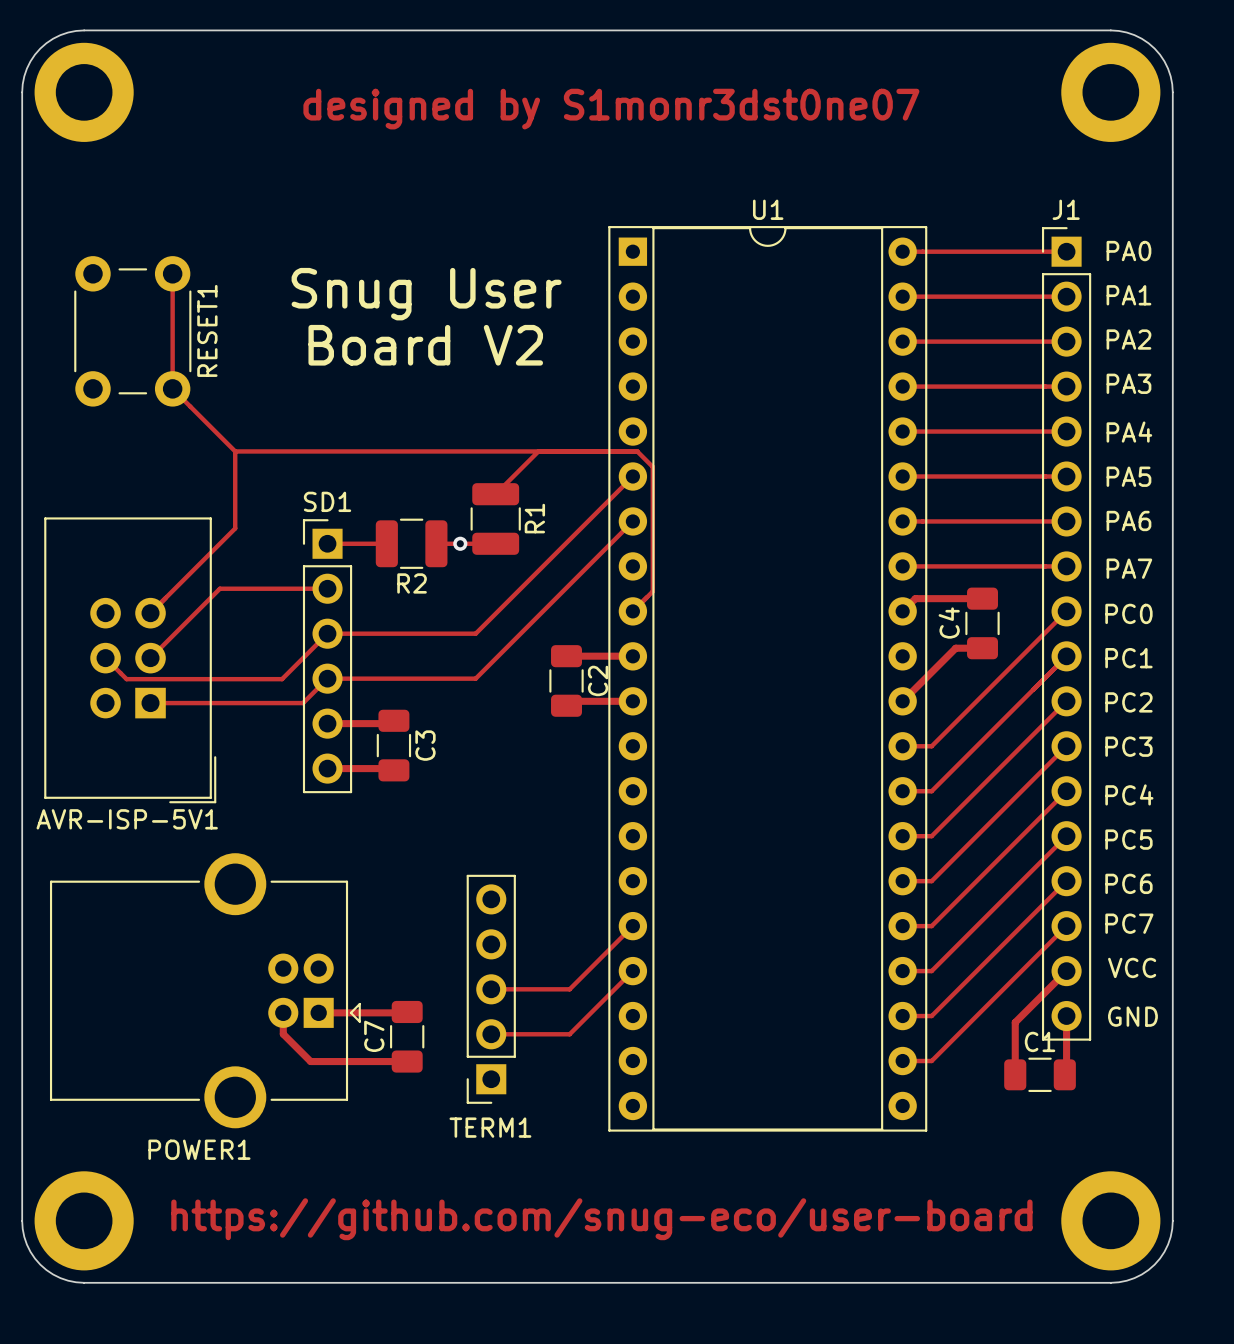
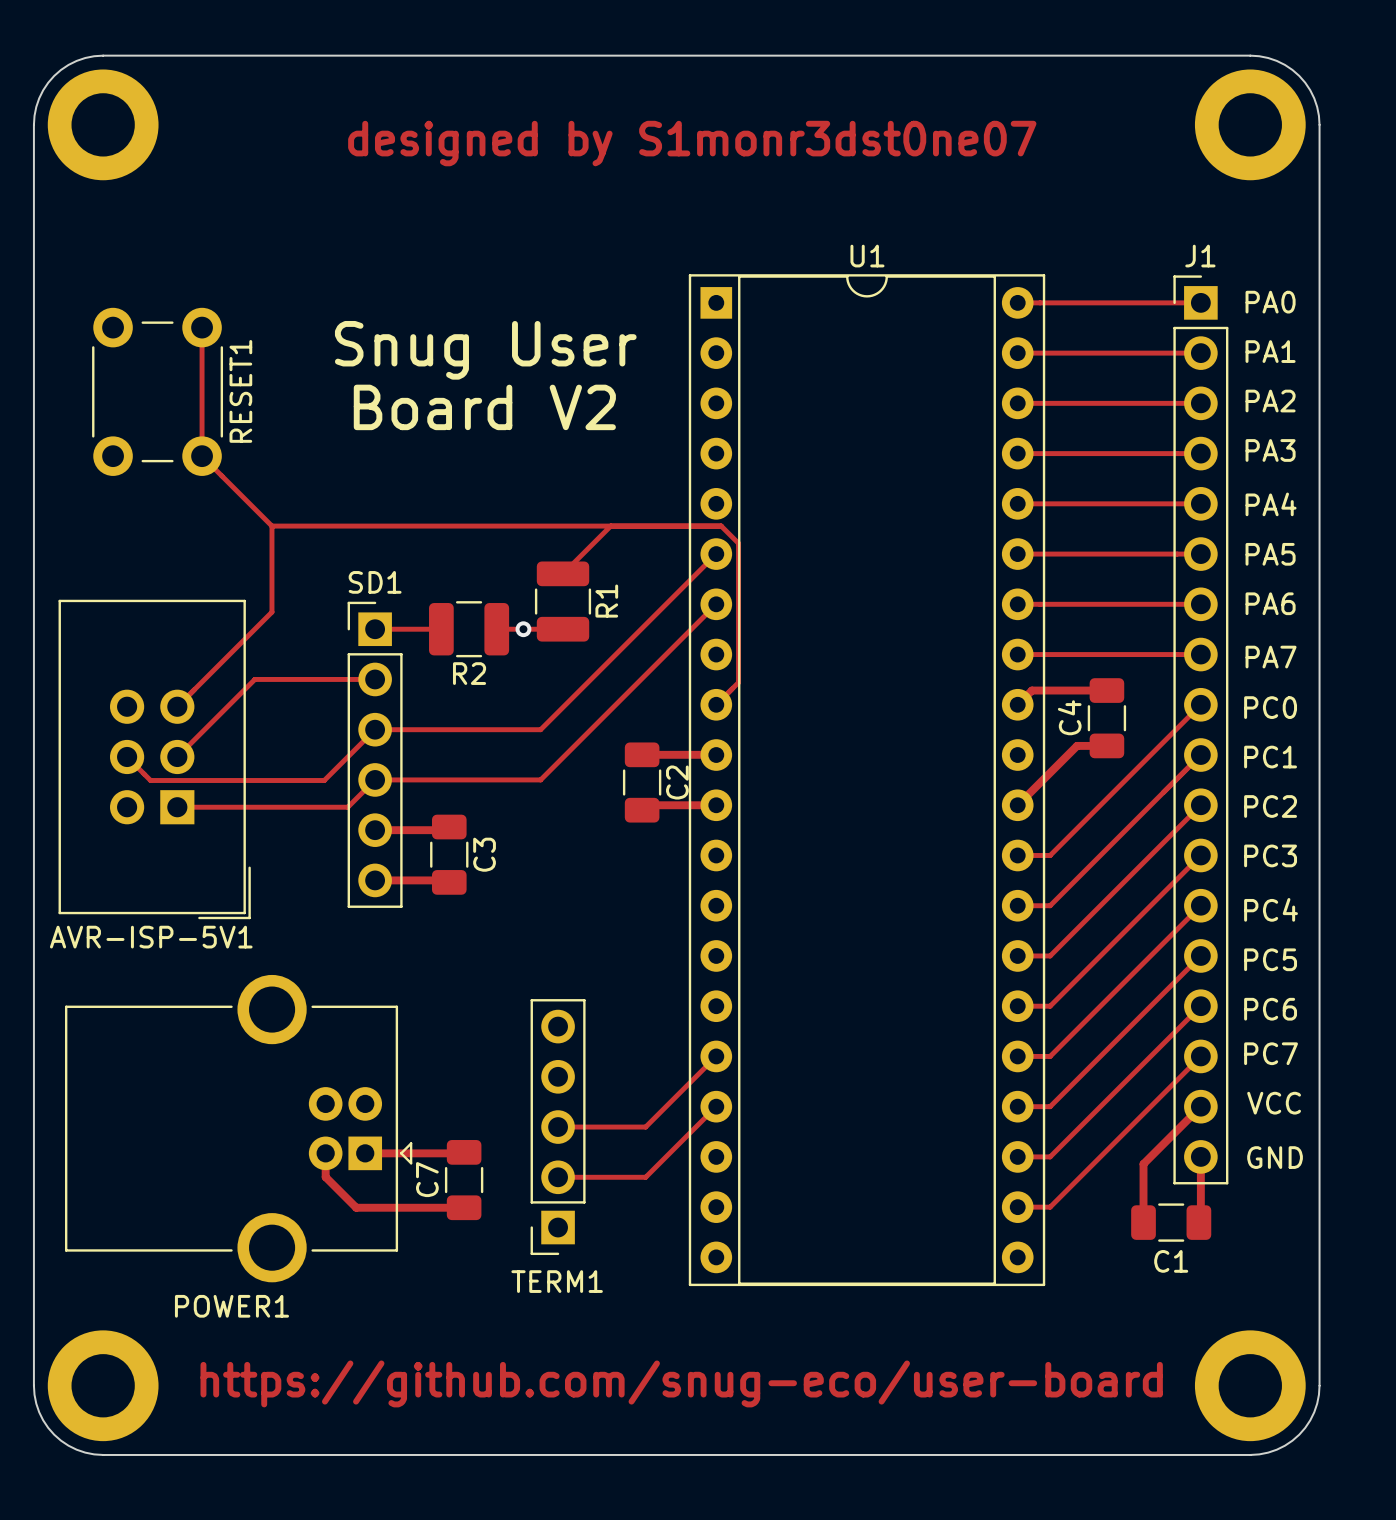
C1 name position: C1 (1040, 1041) -> C1 (1171, 1261)

